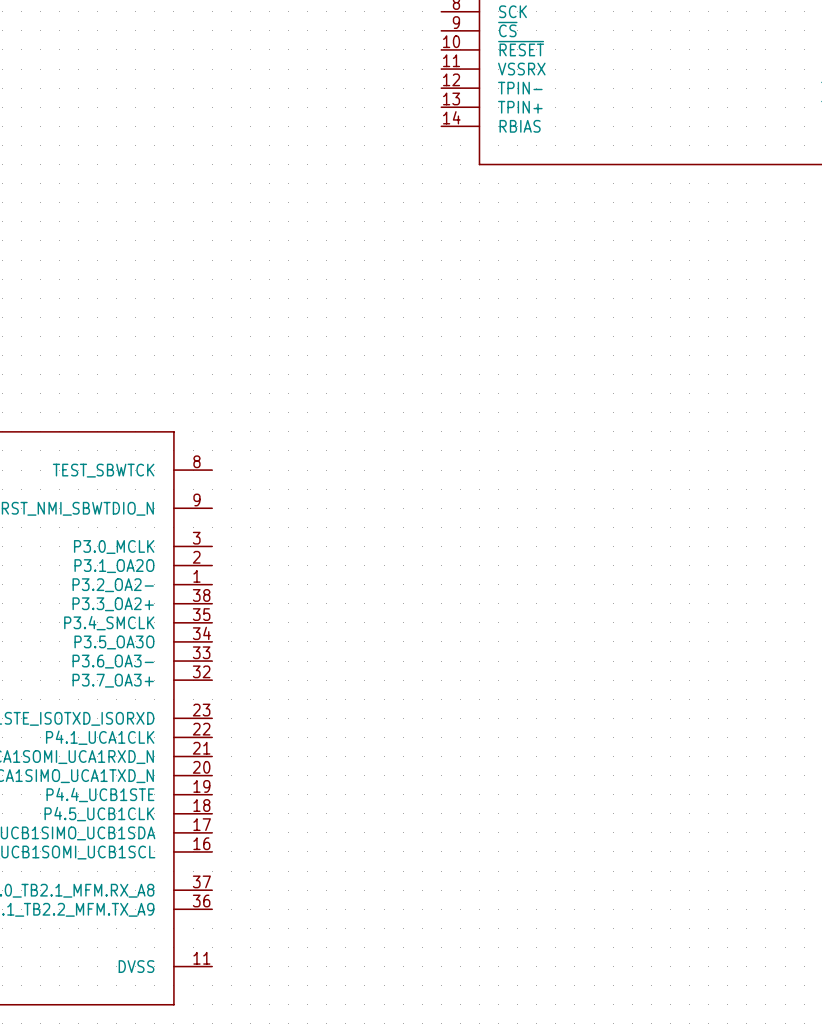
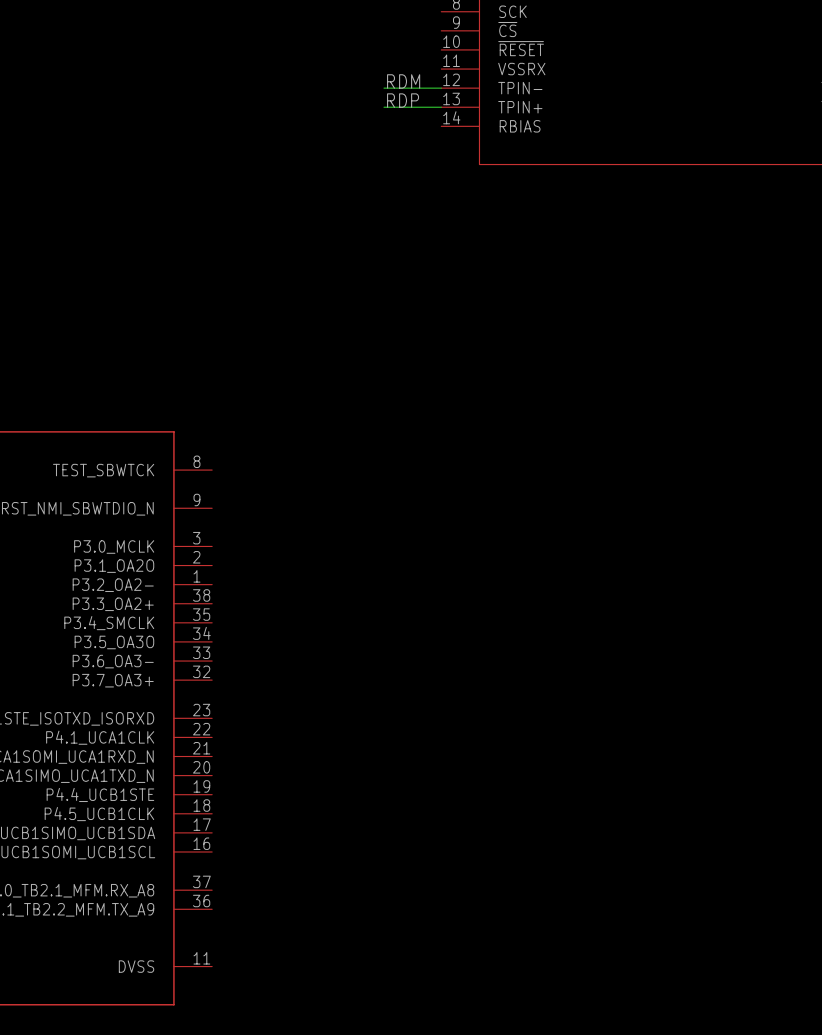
label: none -> RDM (403, 81)
wire: none -> (384, 88) (441, 88)
label: none -> RDP (403, 100)
wire: none -> (384, 107) (441, 107)

